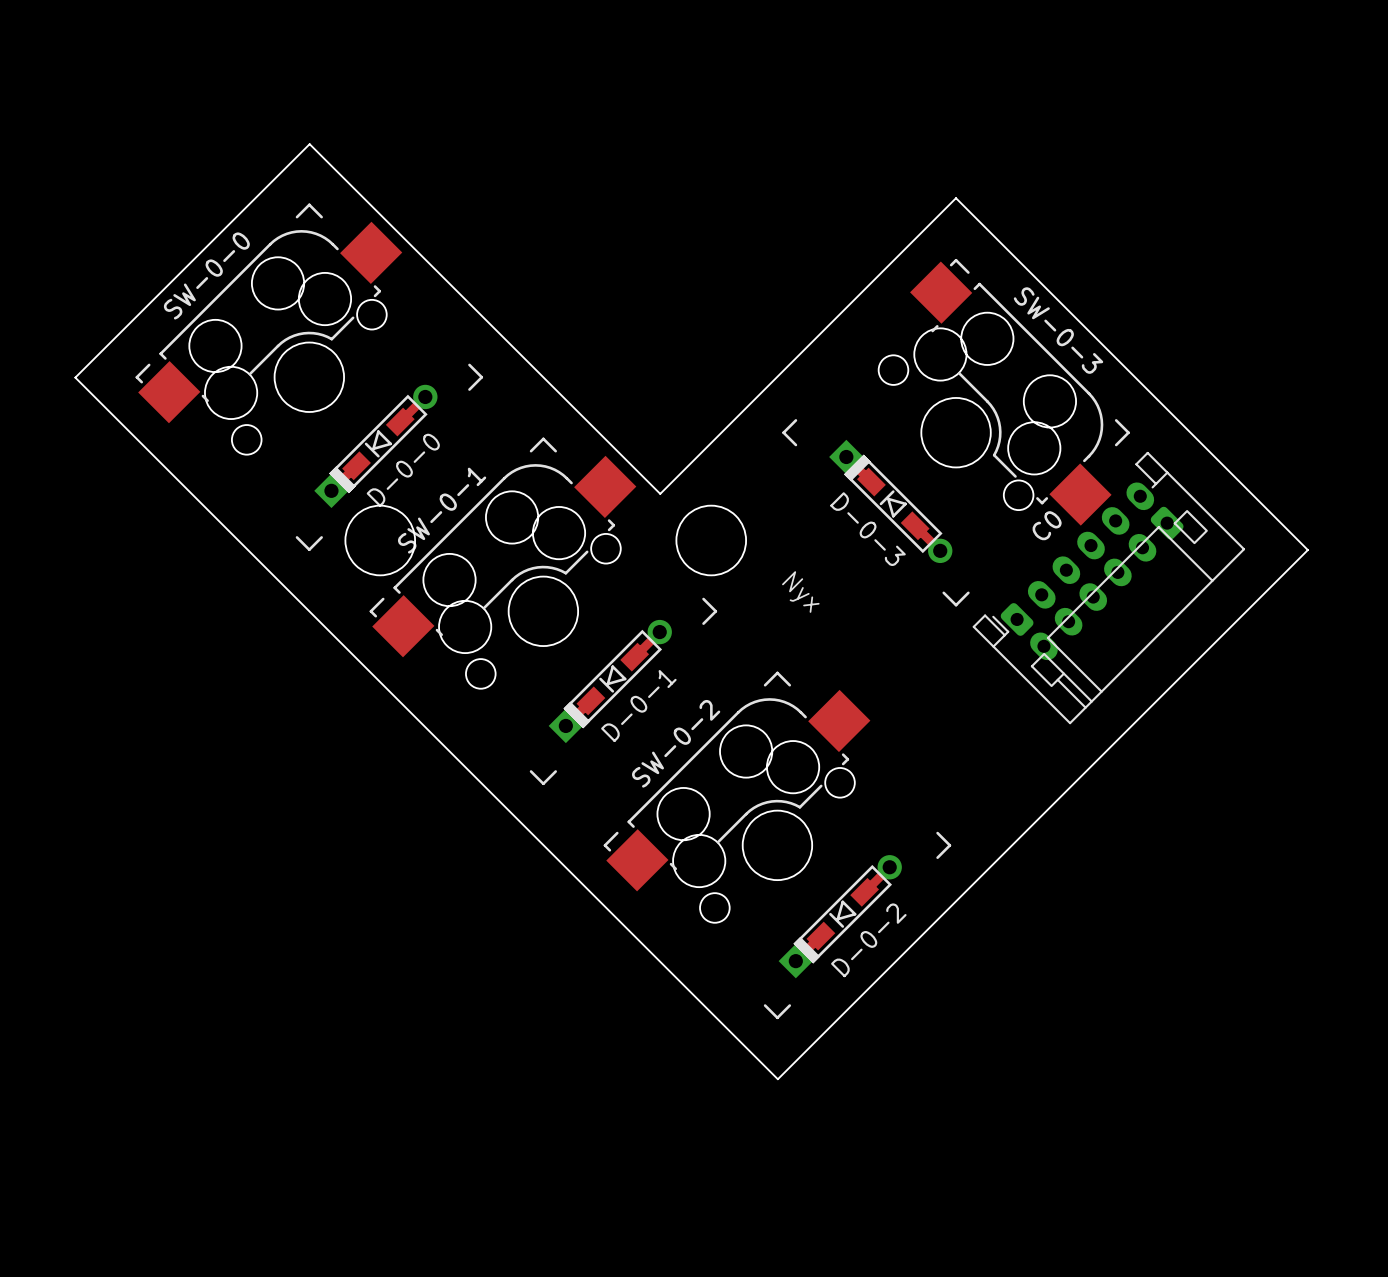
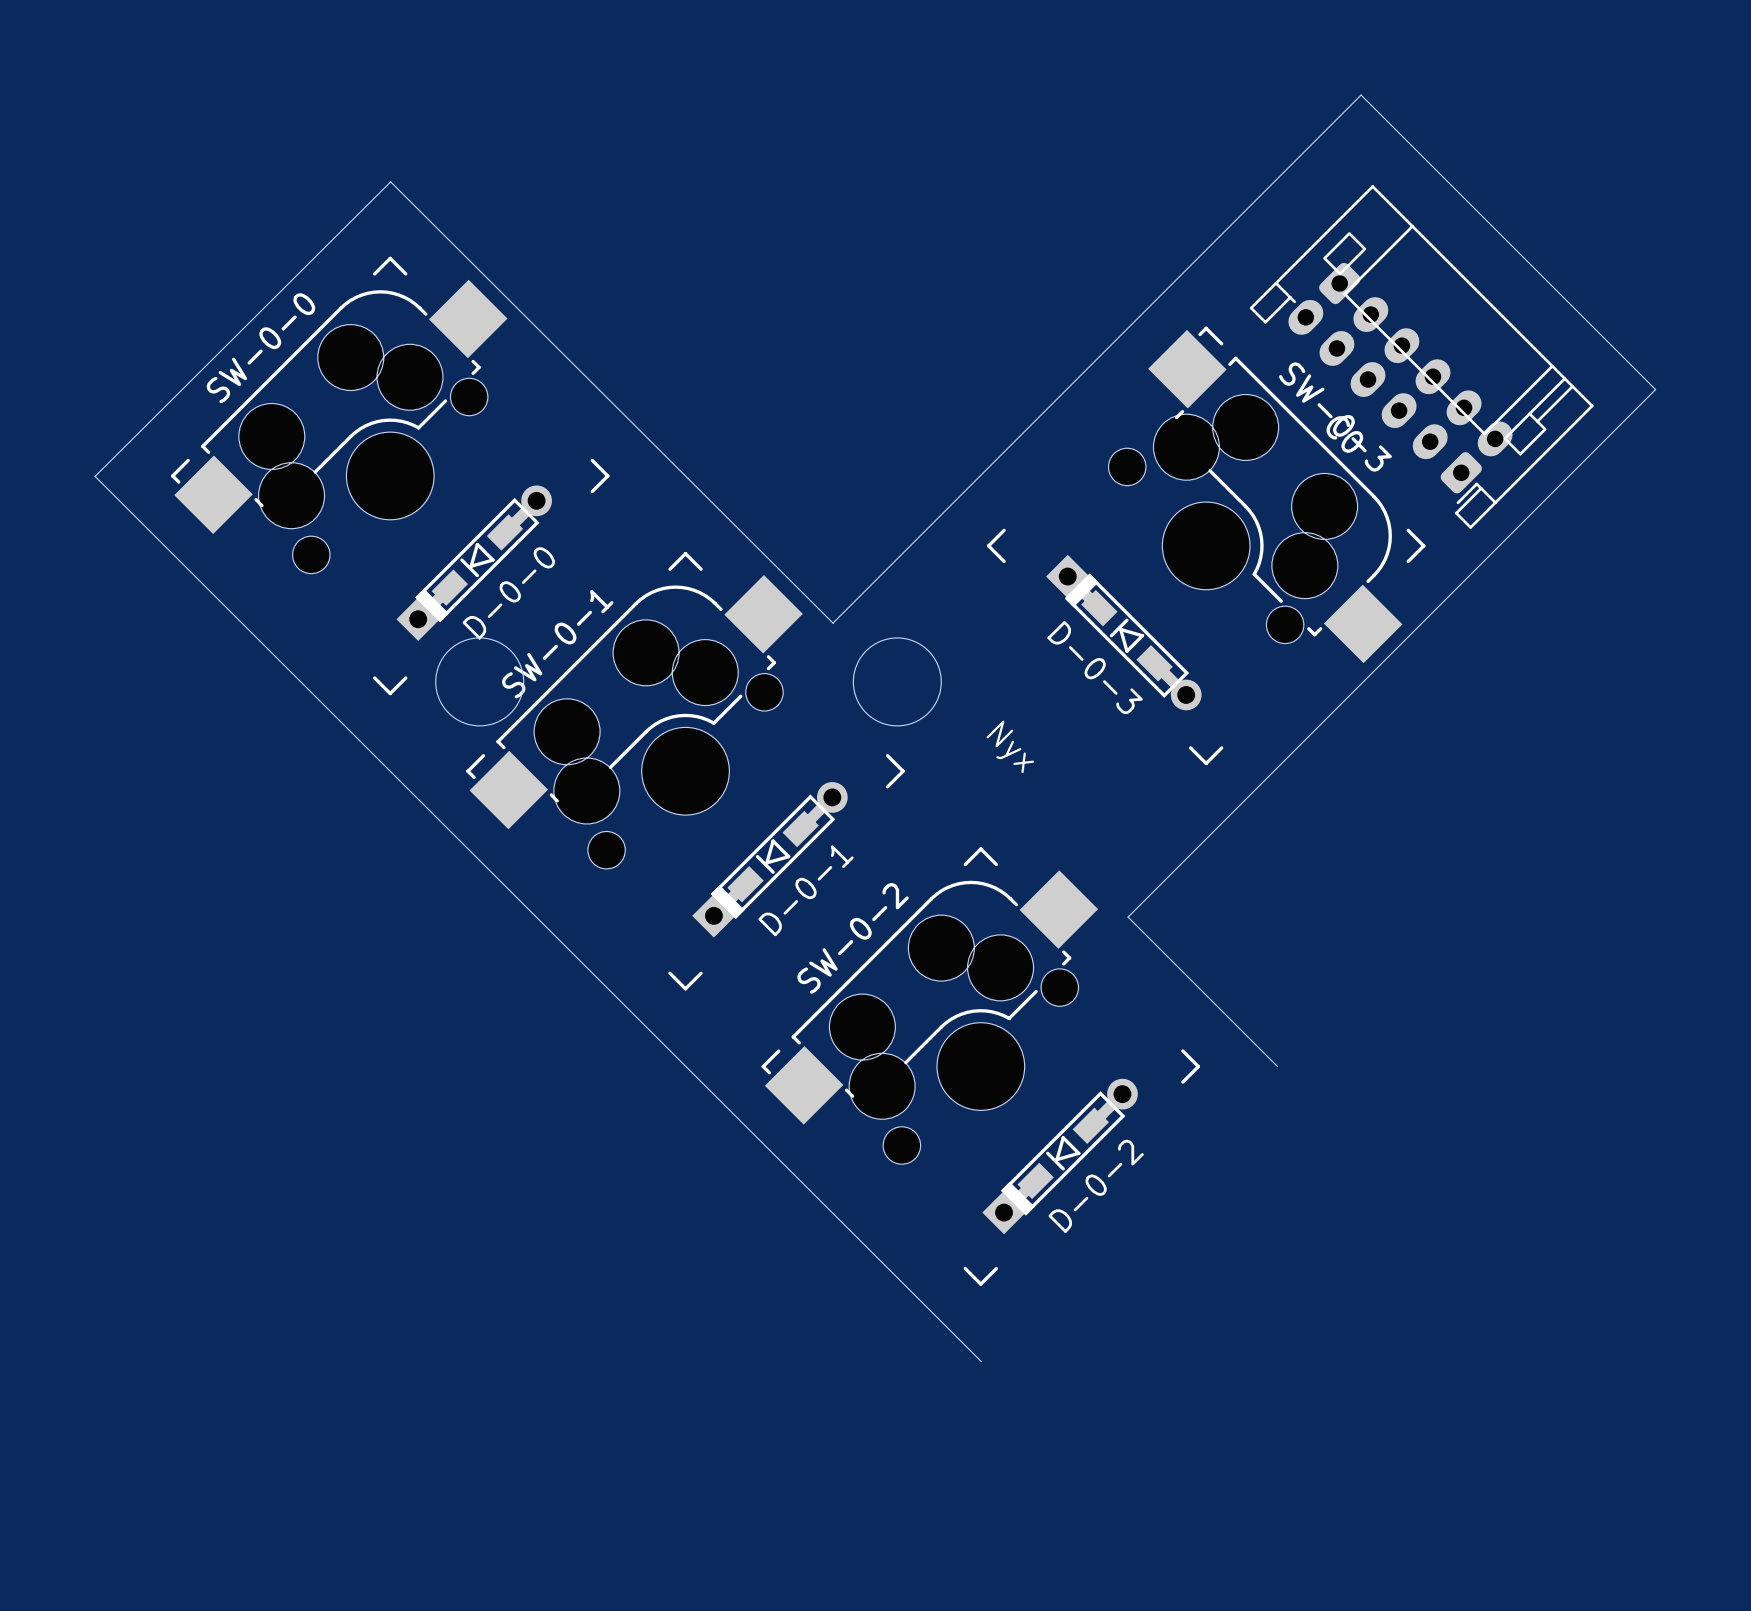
board edge: (956, 198) (1307, 550) (777, 1079) -> (1206, 250) (1361, 95) (1655, 389) (1128, 917) (1277, 1066)
C0 rotation: 0° (1108, 588) -> 90° counterclockwise (1421, 357)
C0 position: (1108, 588) -> (1421, 357)

